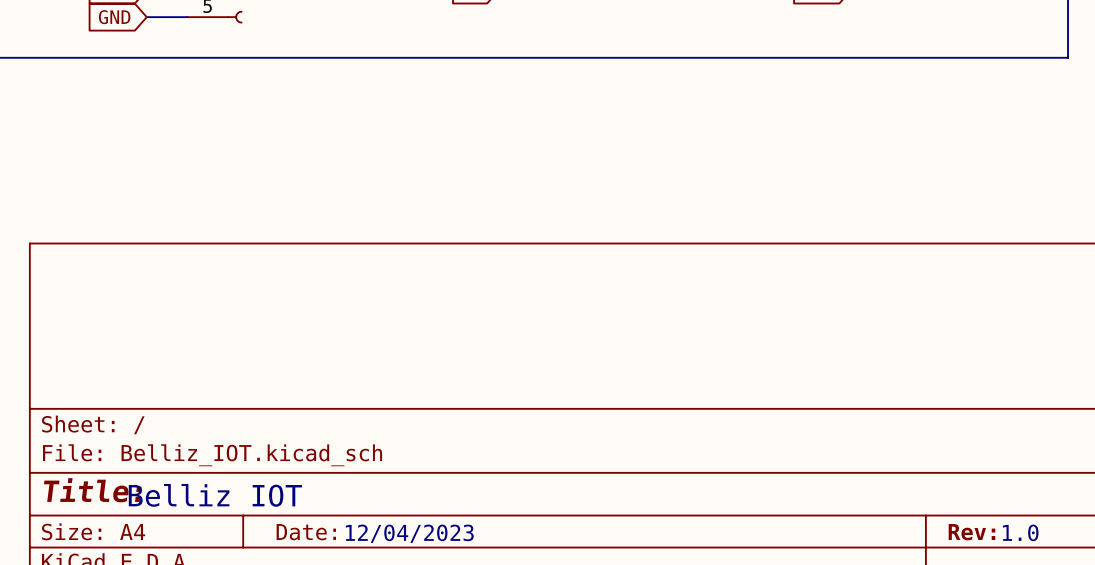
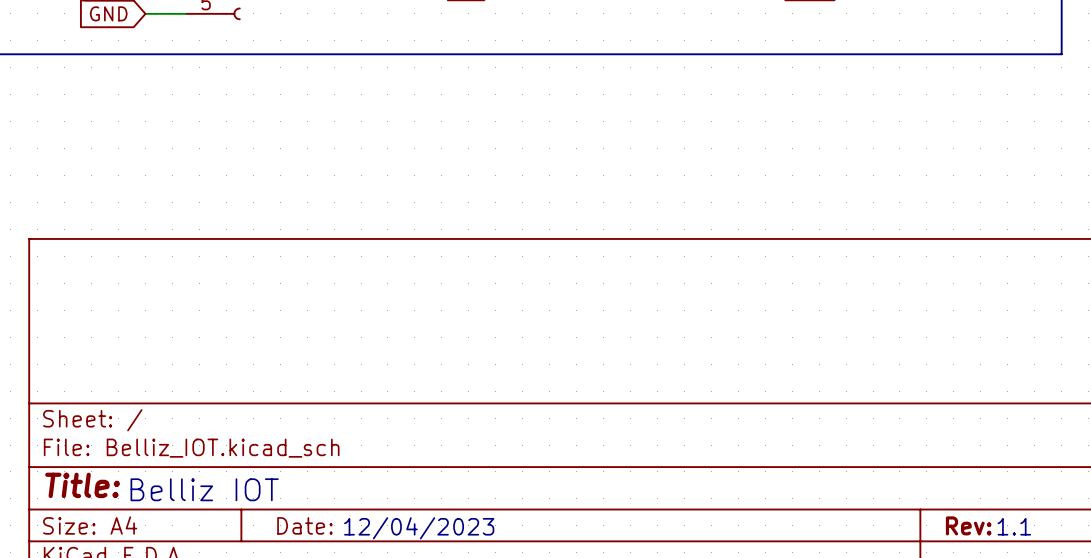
text: 1.0 (1020, 532) -> 1.1 (1014, 526)

